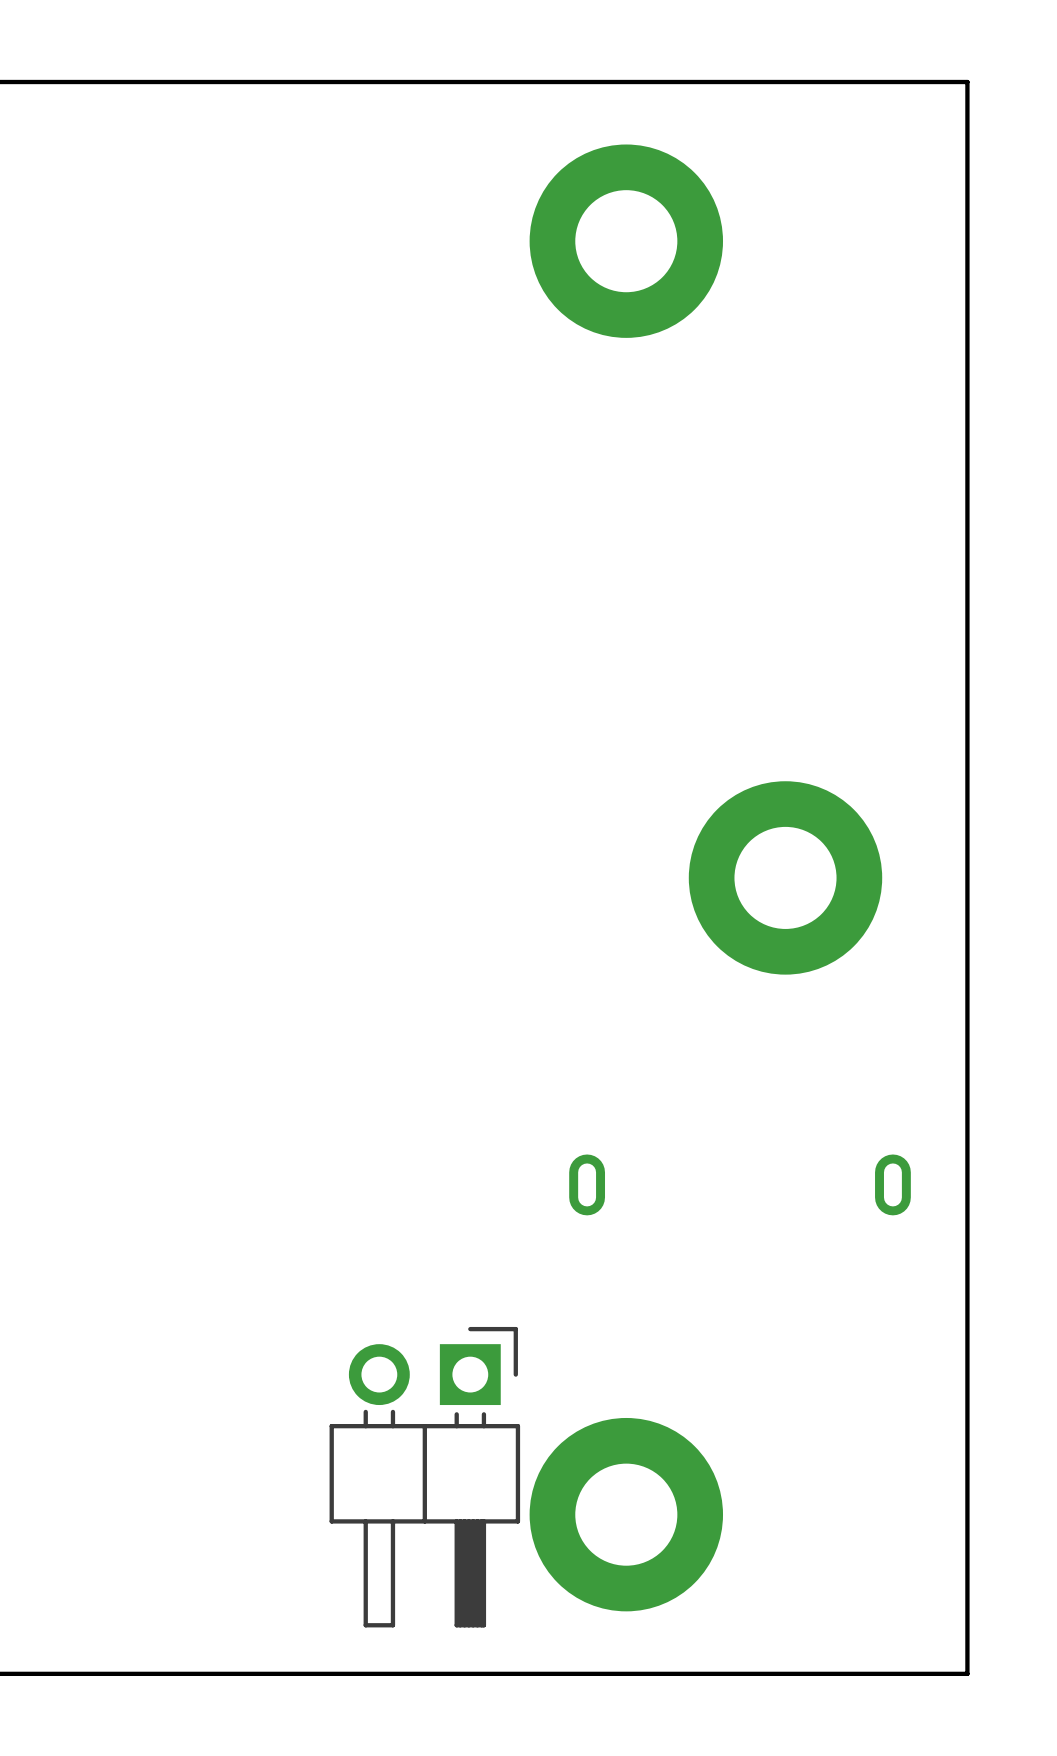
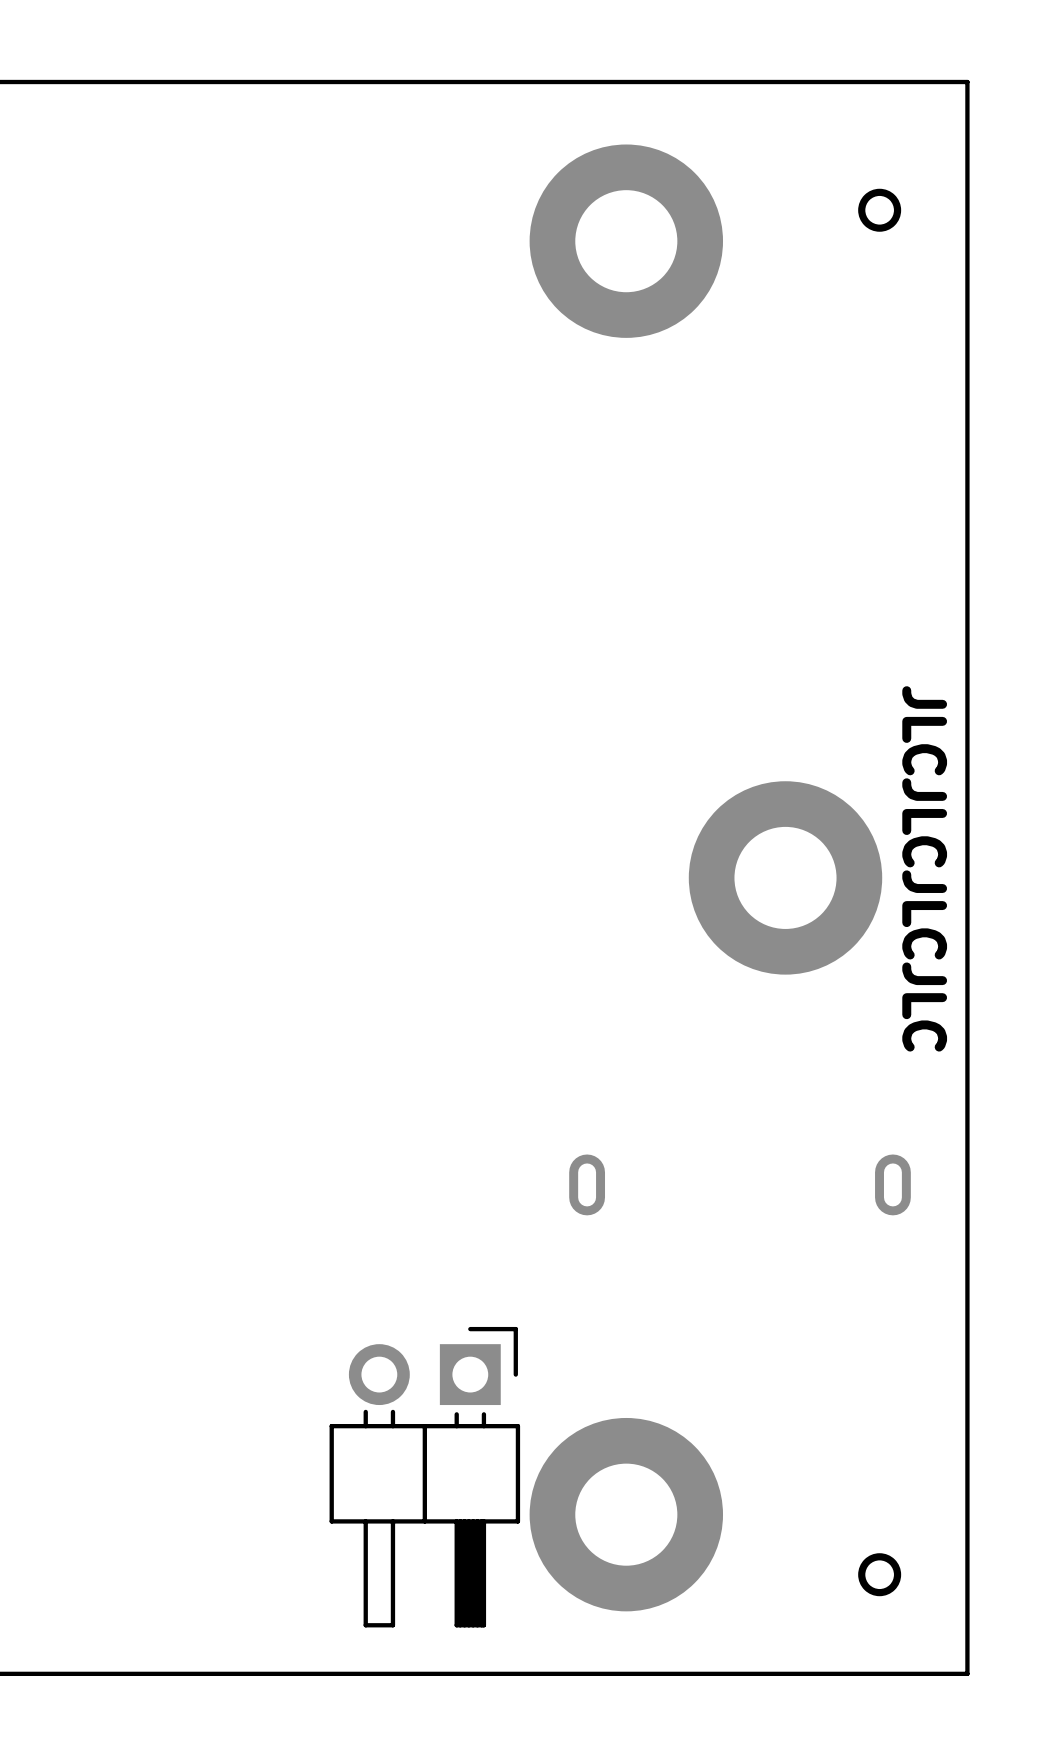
round board edge: none -> [858, 188, 902, 232]
text: none -> JLCJLCJLCJLC (924, 868)
round board edge: none -> [858, 1553, 902, 1597]

